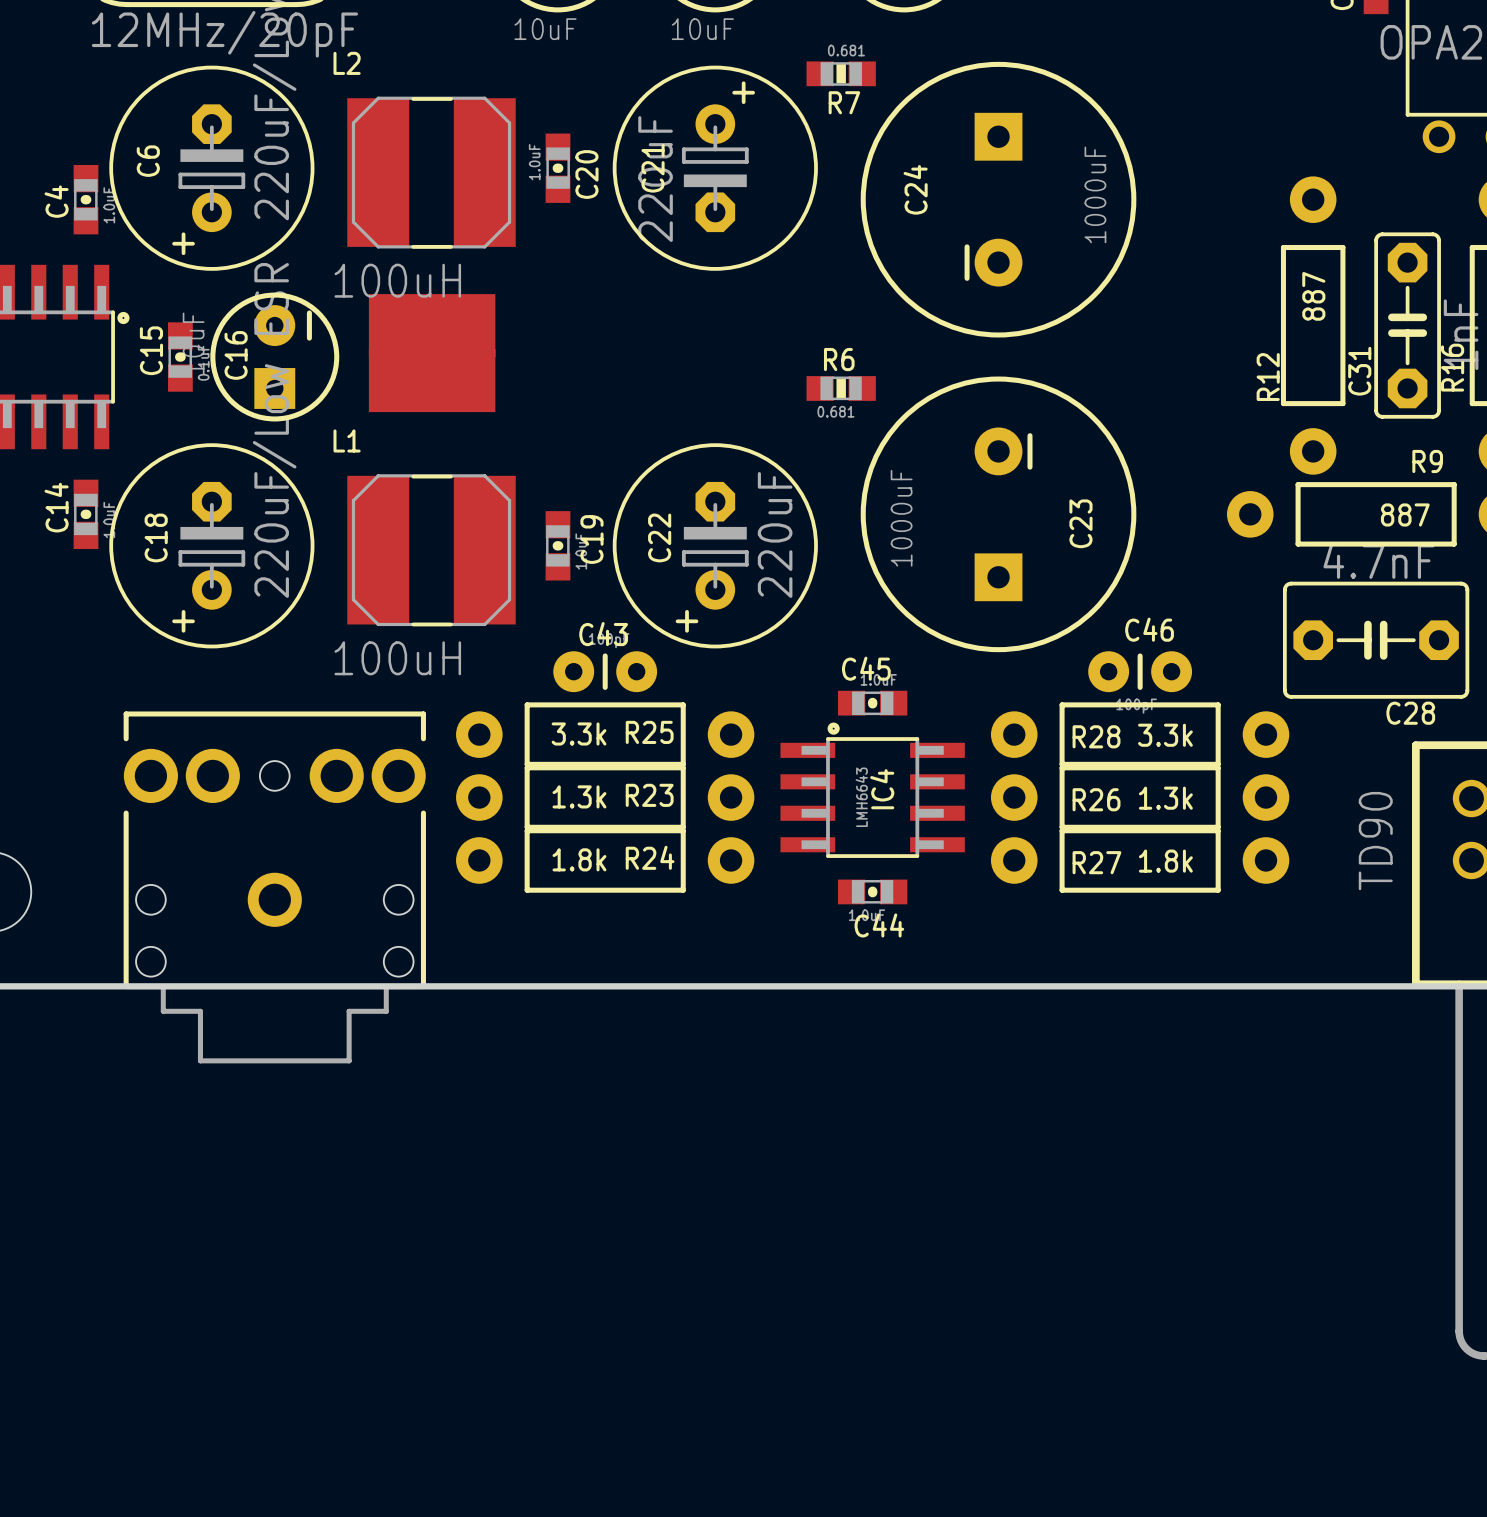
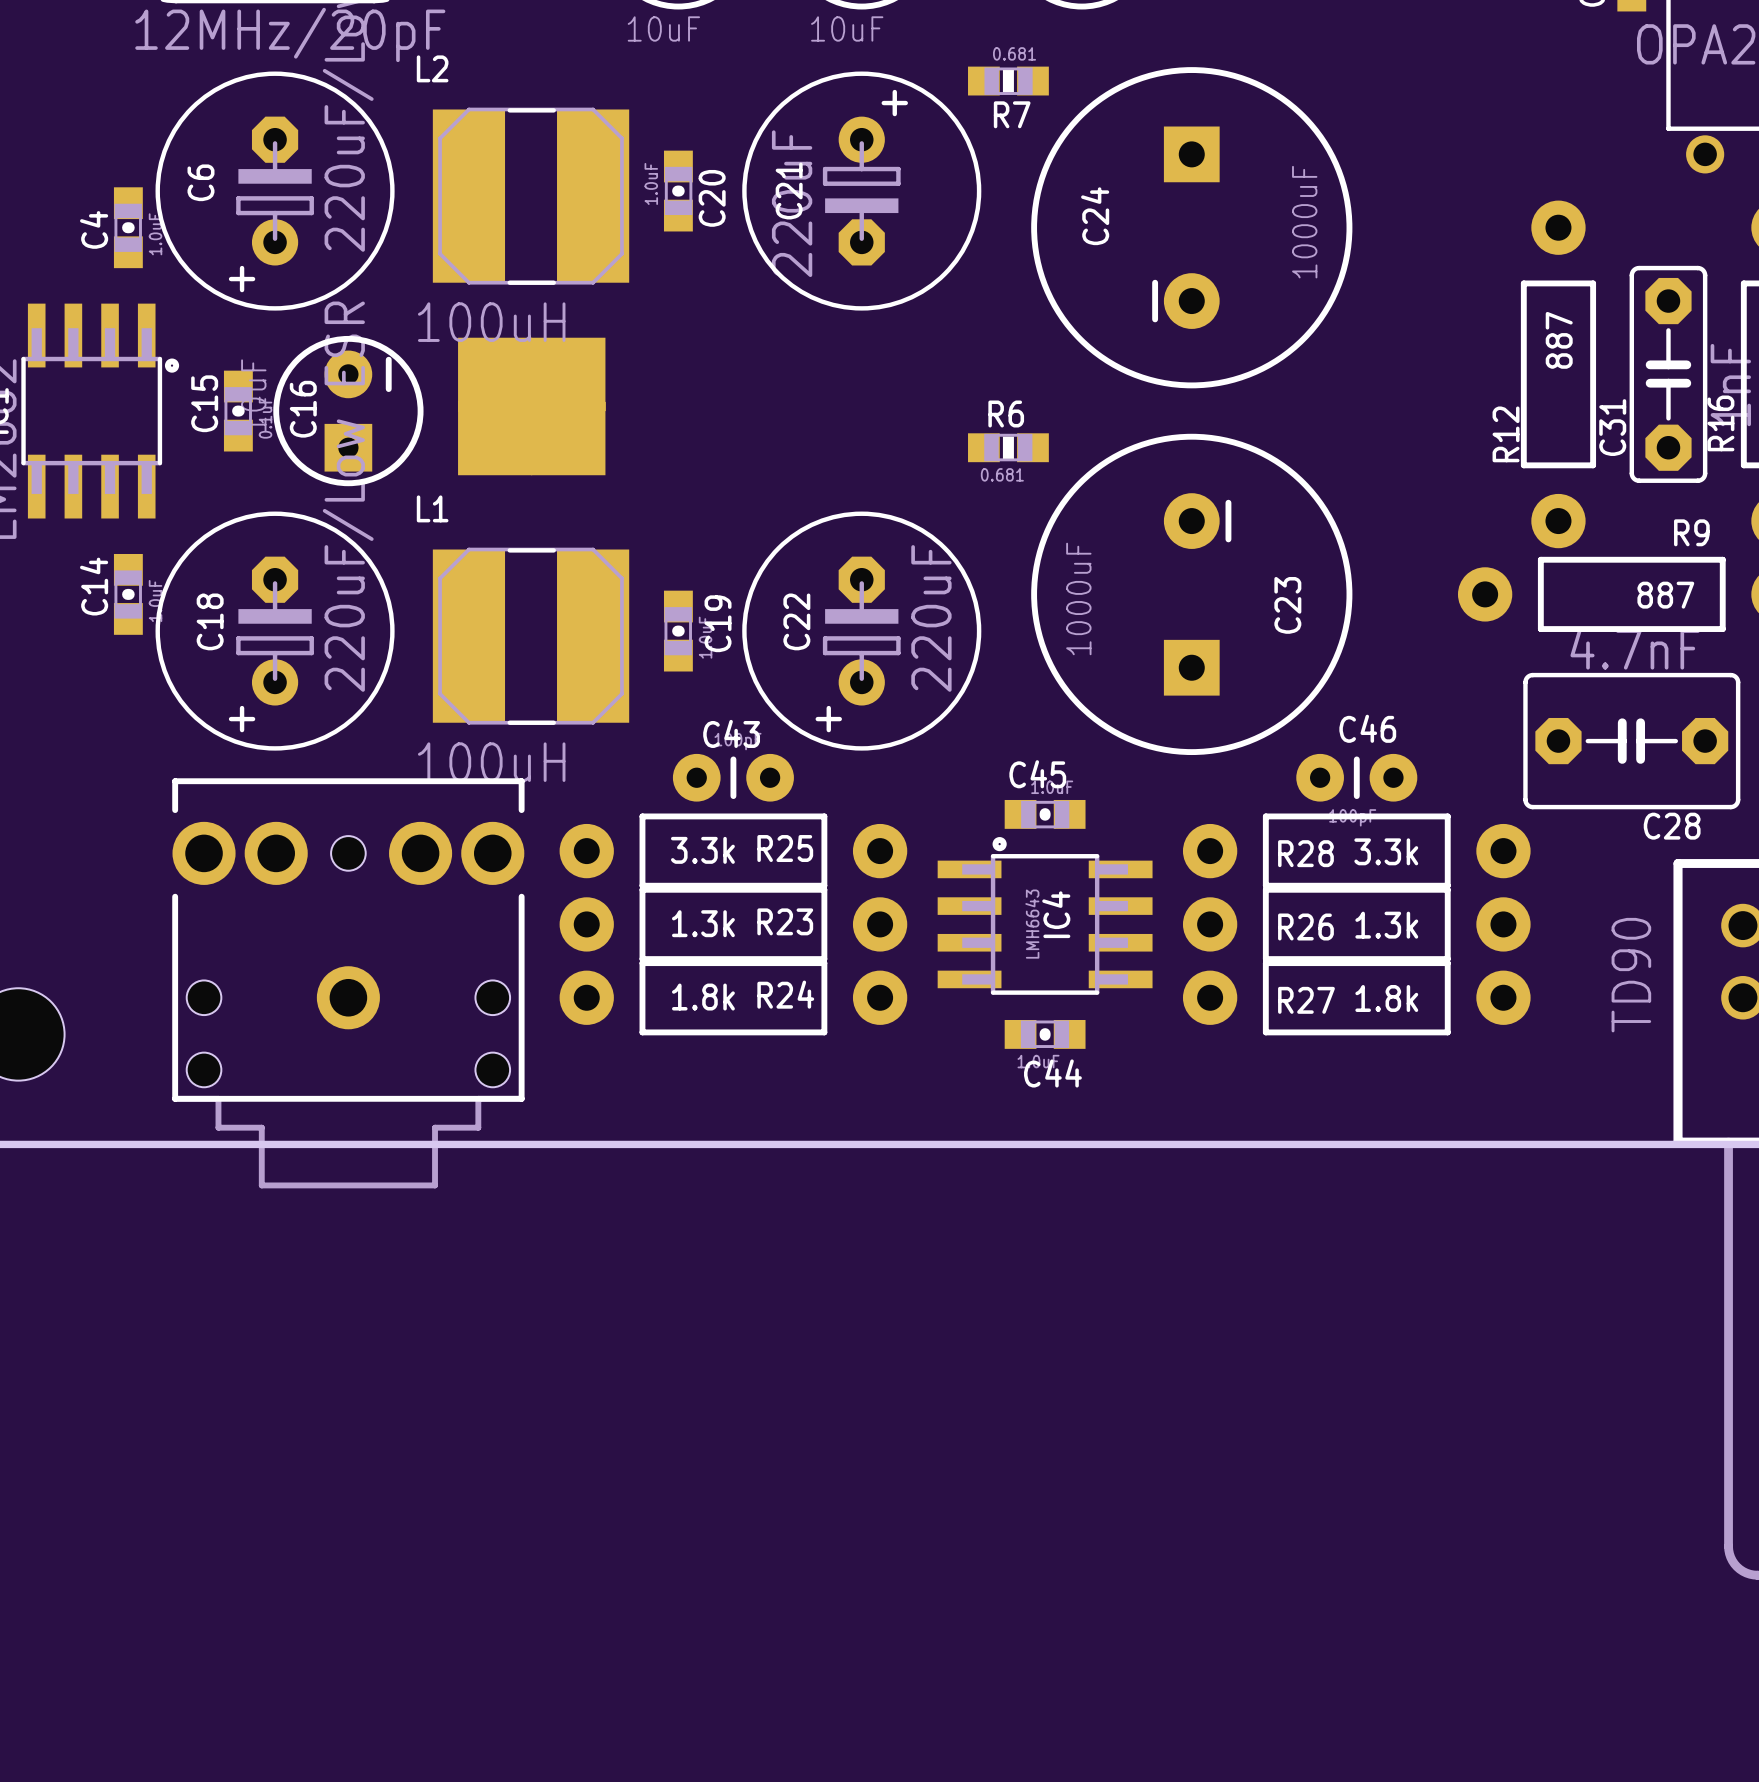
part position: (274, 887) -> (348, 983)

